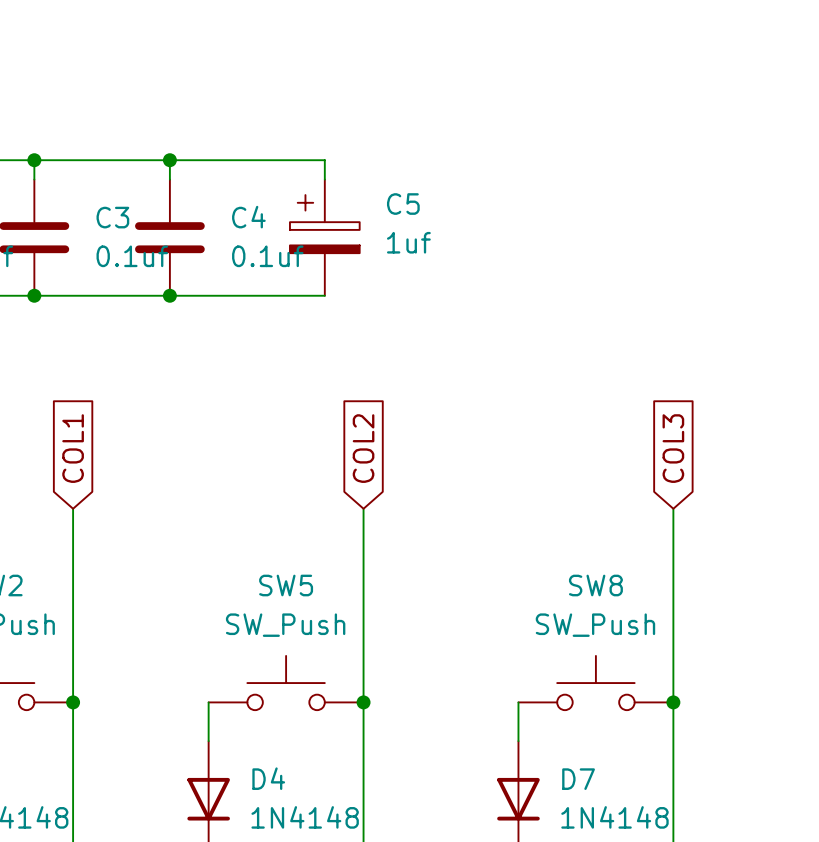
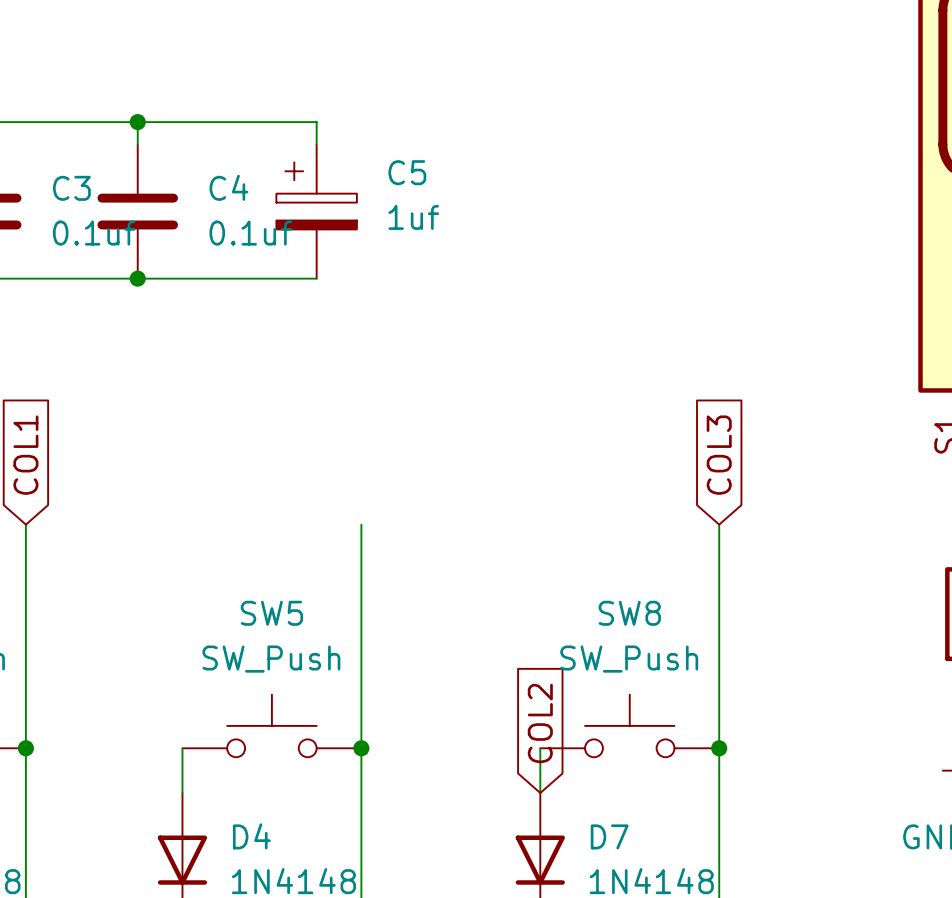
global label position: COL2 (363, 448) -> COL2 (540, 723)

